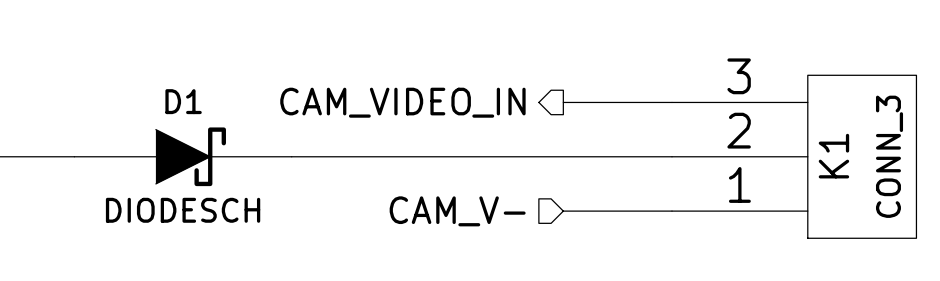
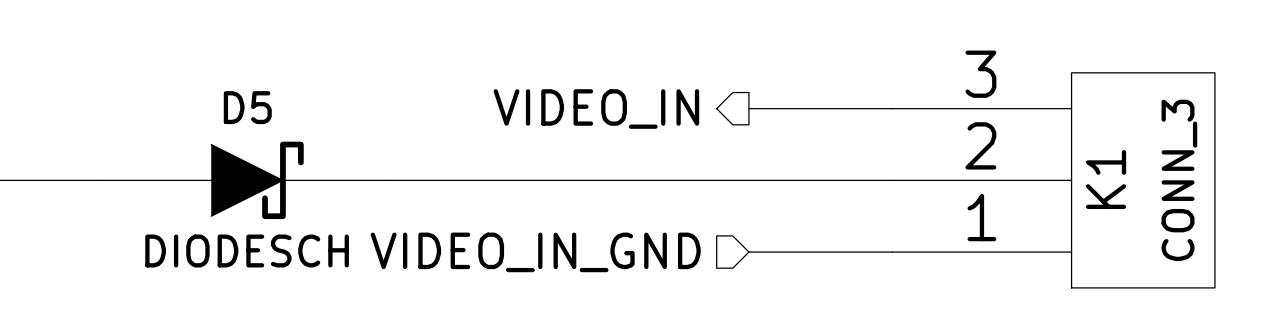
D1 name: D1 (183, 101) -> D5 (247, 107)
hierarchical label: CAM_VIDEO_IN (402, 102) -> VIDEO_IN (596, 109)
hierarchical label: CAM_V- (457, 211) -> VIDEO_IN_GND (535, 252)

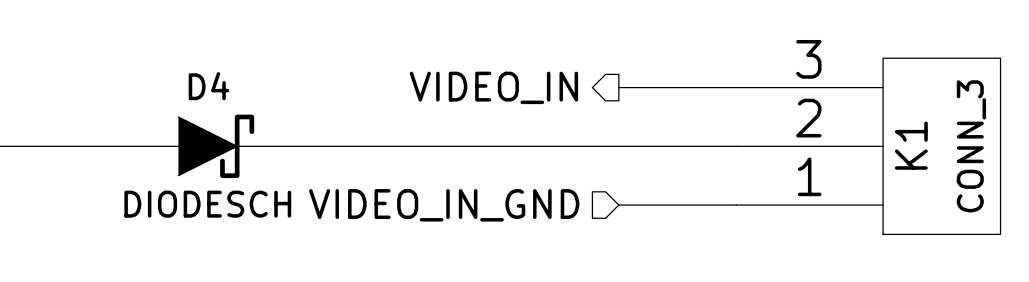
D5 name: D5 (247, 107) -> D4 (208, 86)

